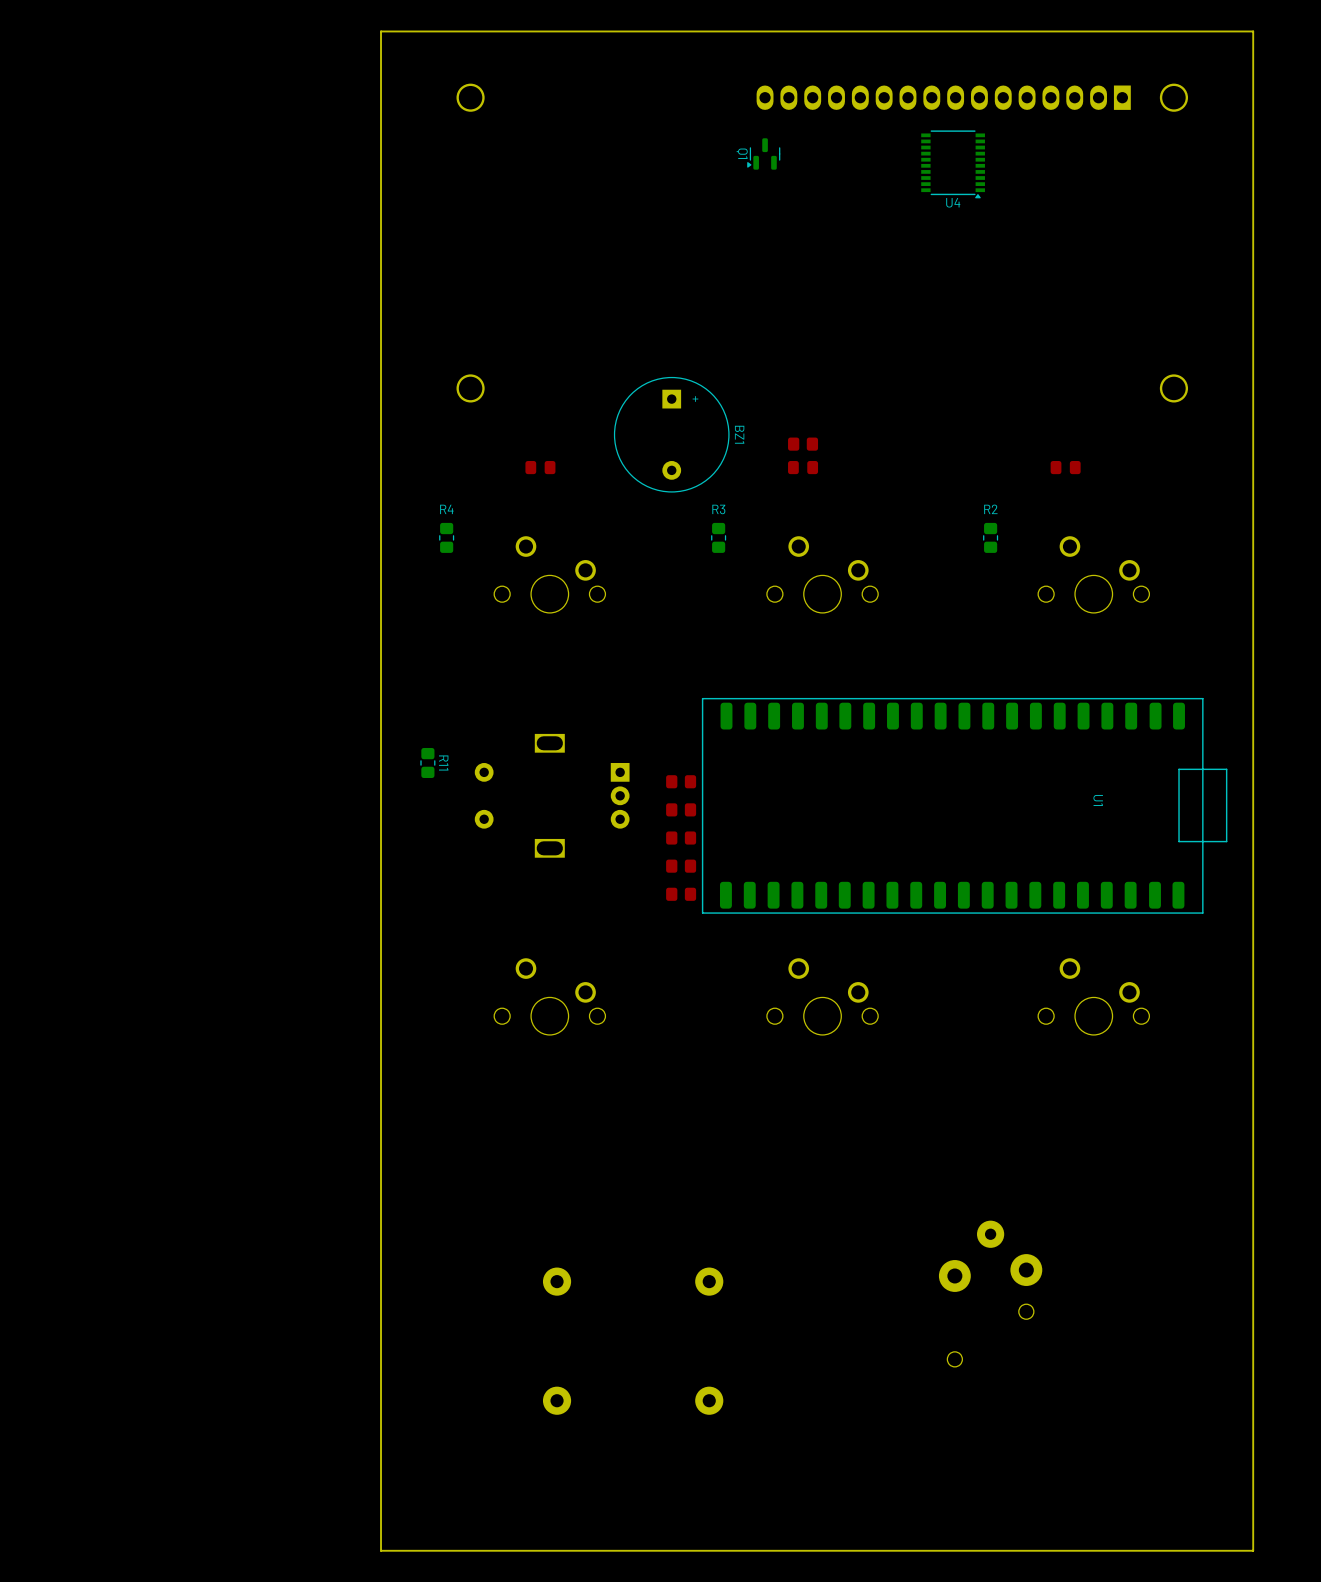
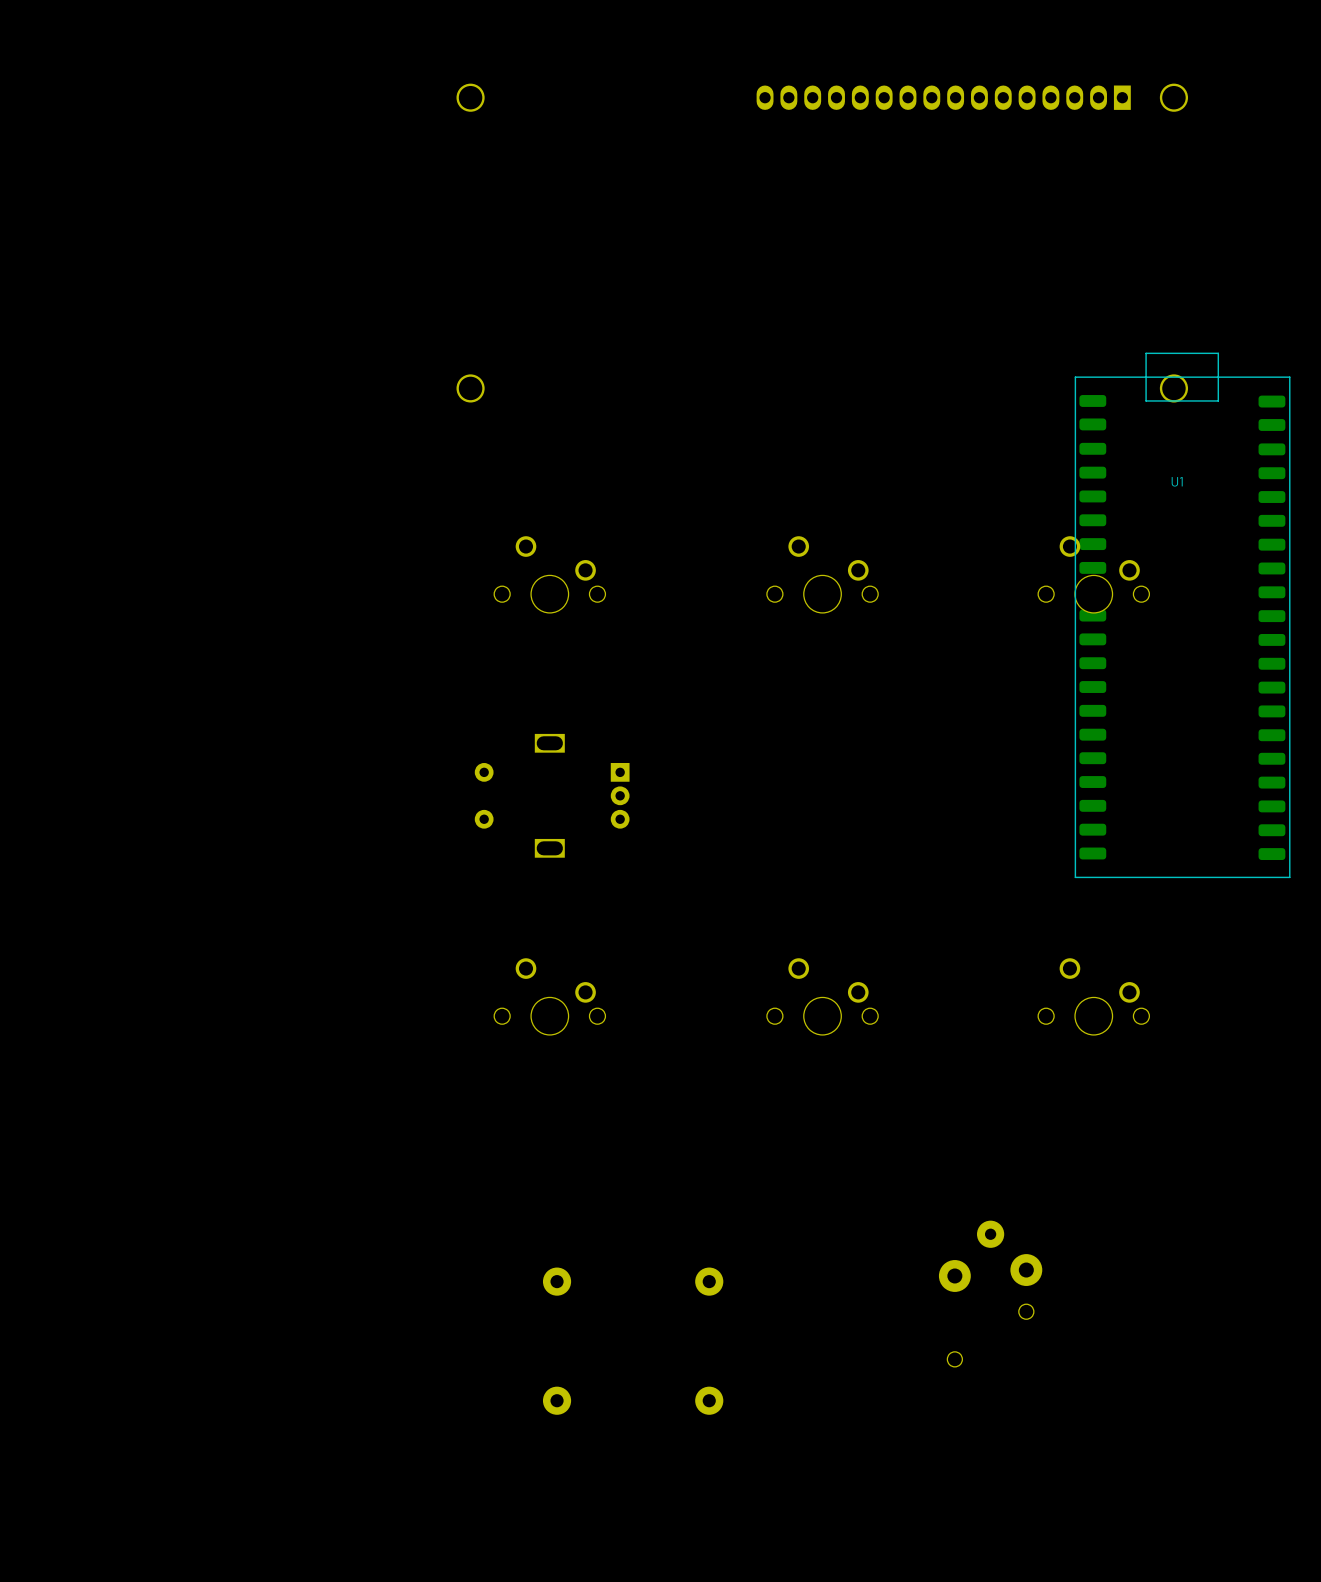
board edge: (1253, 31) (381, 31) (381, 1550) (1253, 1550) (1253, 31) -> none
Q1: (763, 153) -> none
U4: (953, 164) -> none
BZ1: (671, 434) -> none
part: (803, 444) -> none
part: (540, 467) -> none
part: (803, 467) -> none
part: (1065, 467) -> none
R4: (446, 537) -> none
R3: (718, 537) -> none
R2: (990, 537) -> none
R11: (427, 762) -> none
part: (681, 781) -> none
U1 rotation: 0° (964, 805) -> 90° counterclockwise (1182, 615)
part: (681, 809) -> none
part: (681, 838) -> none
part: (681, 866) -> none
part: (681, 894) -> none

